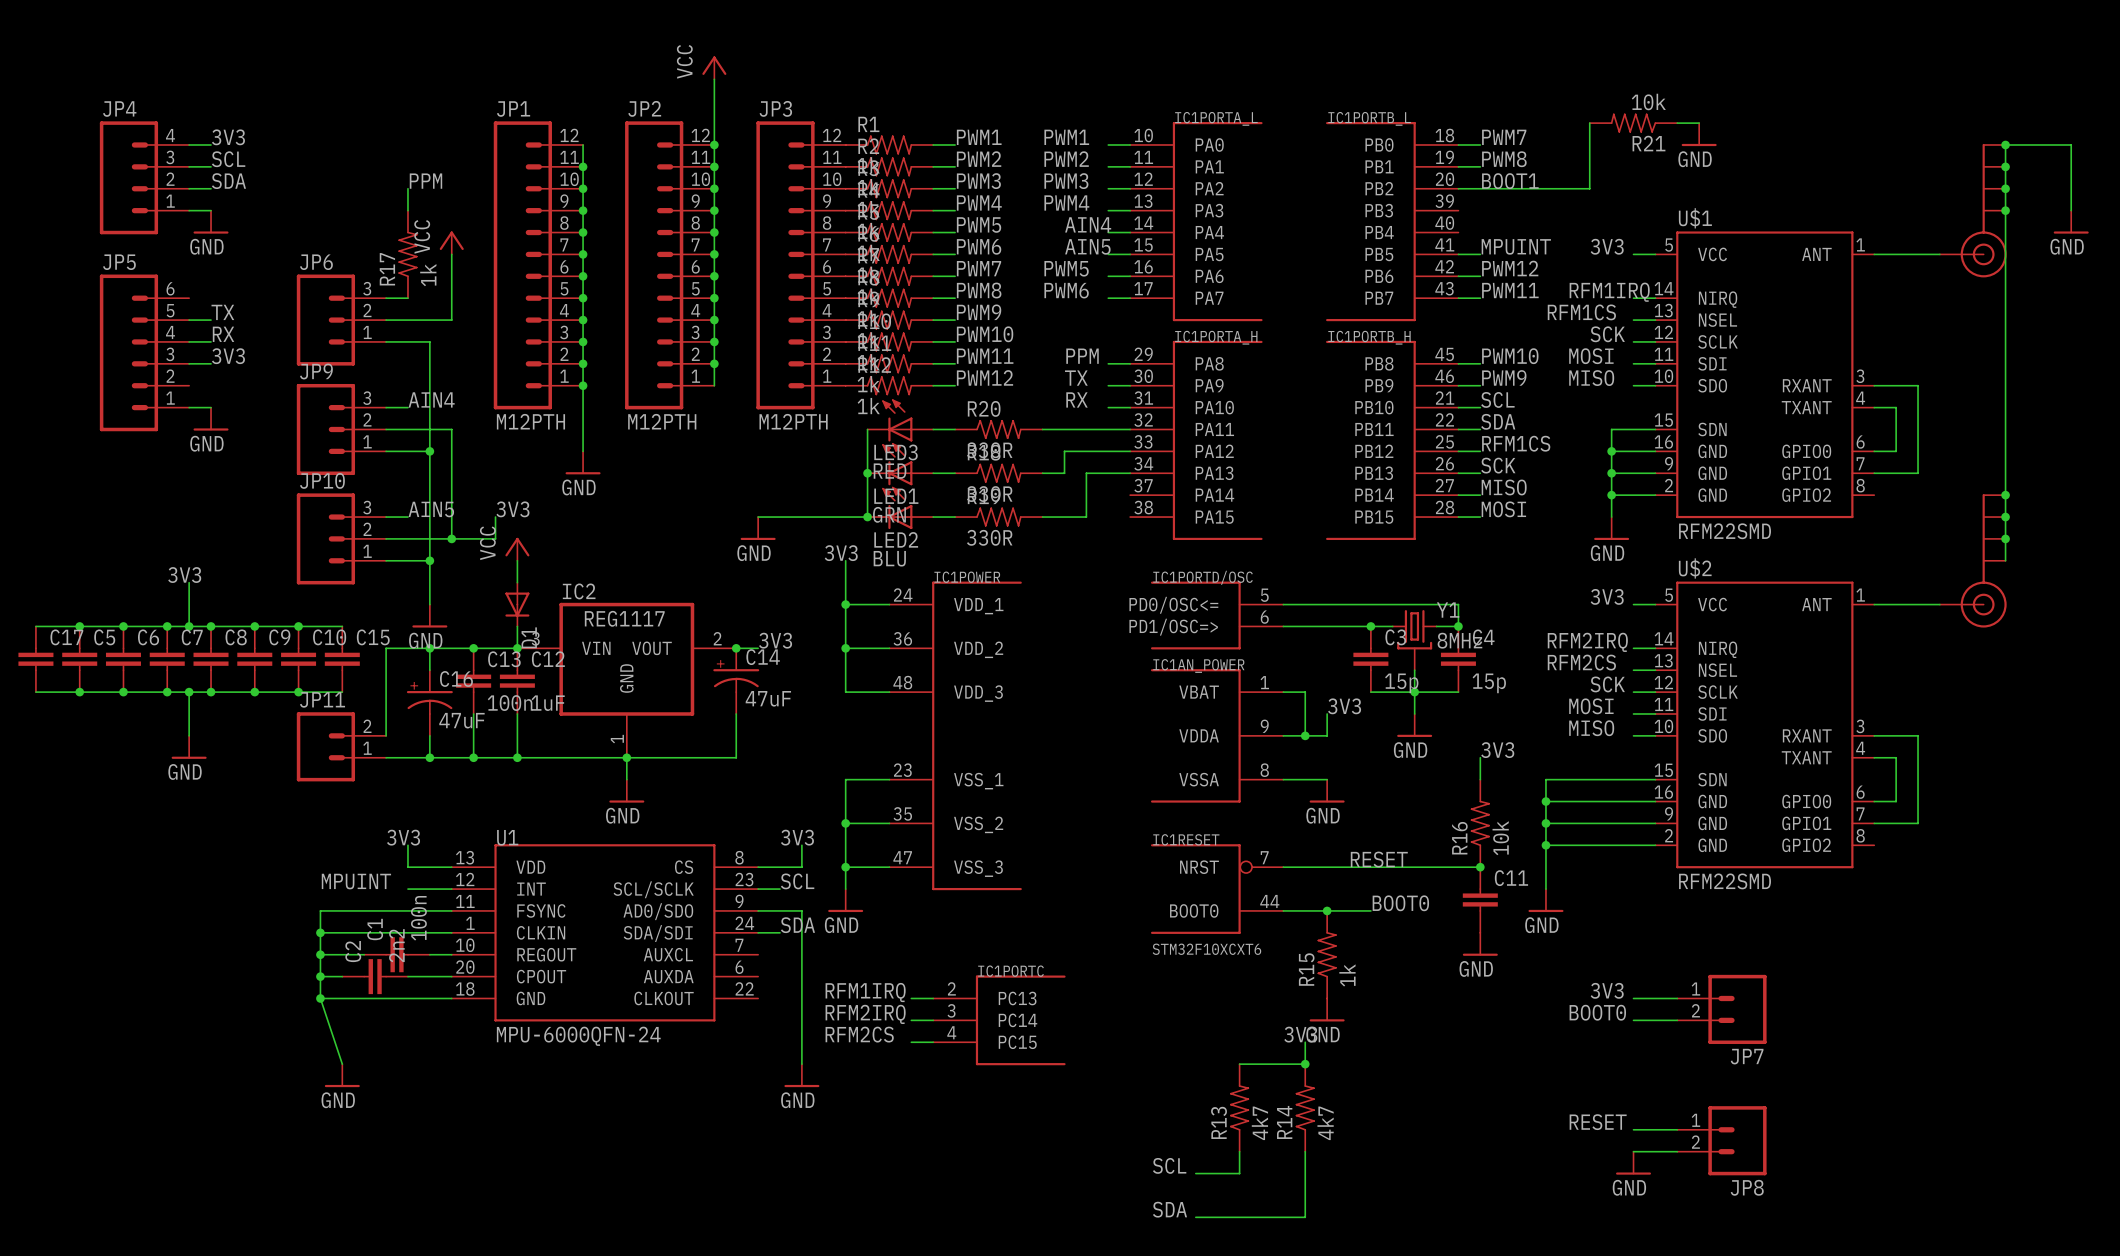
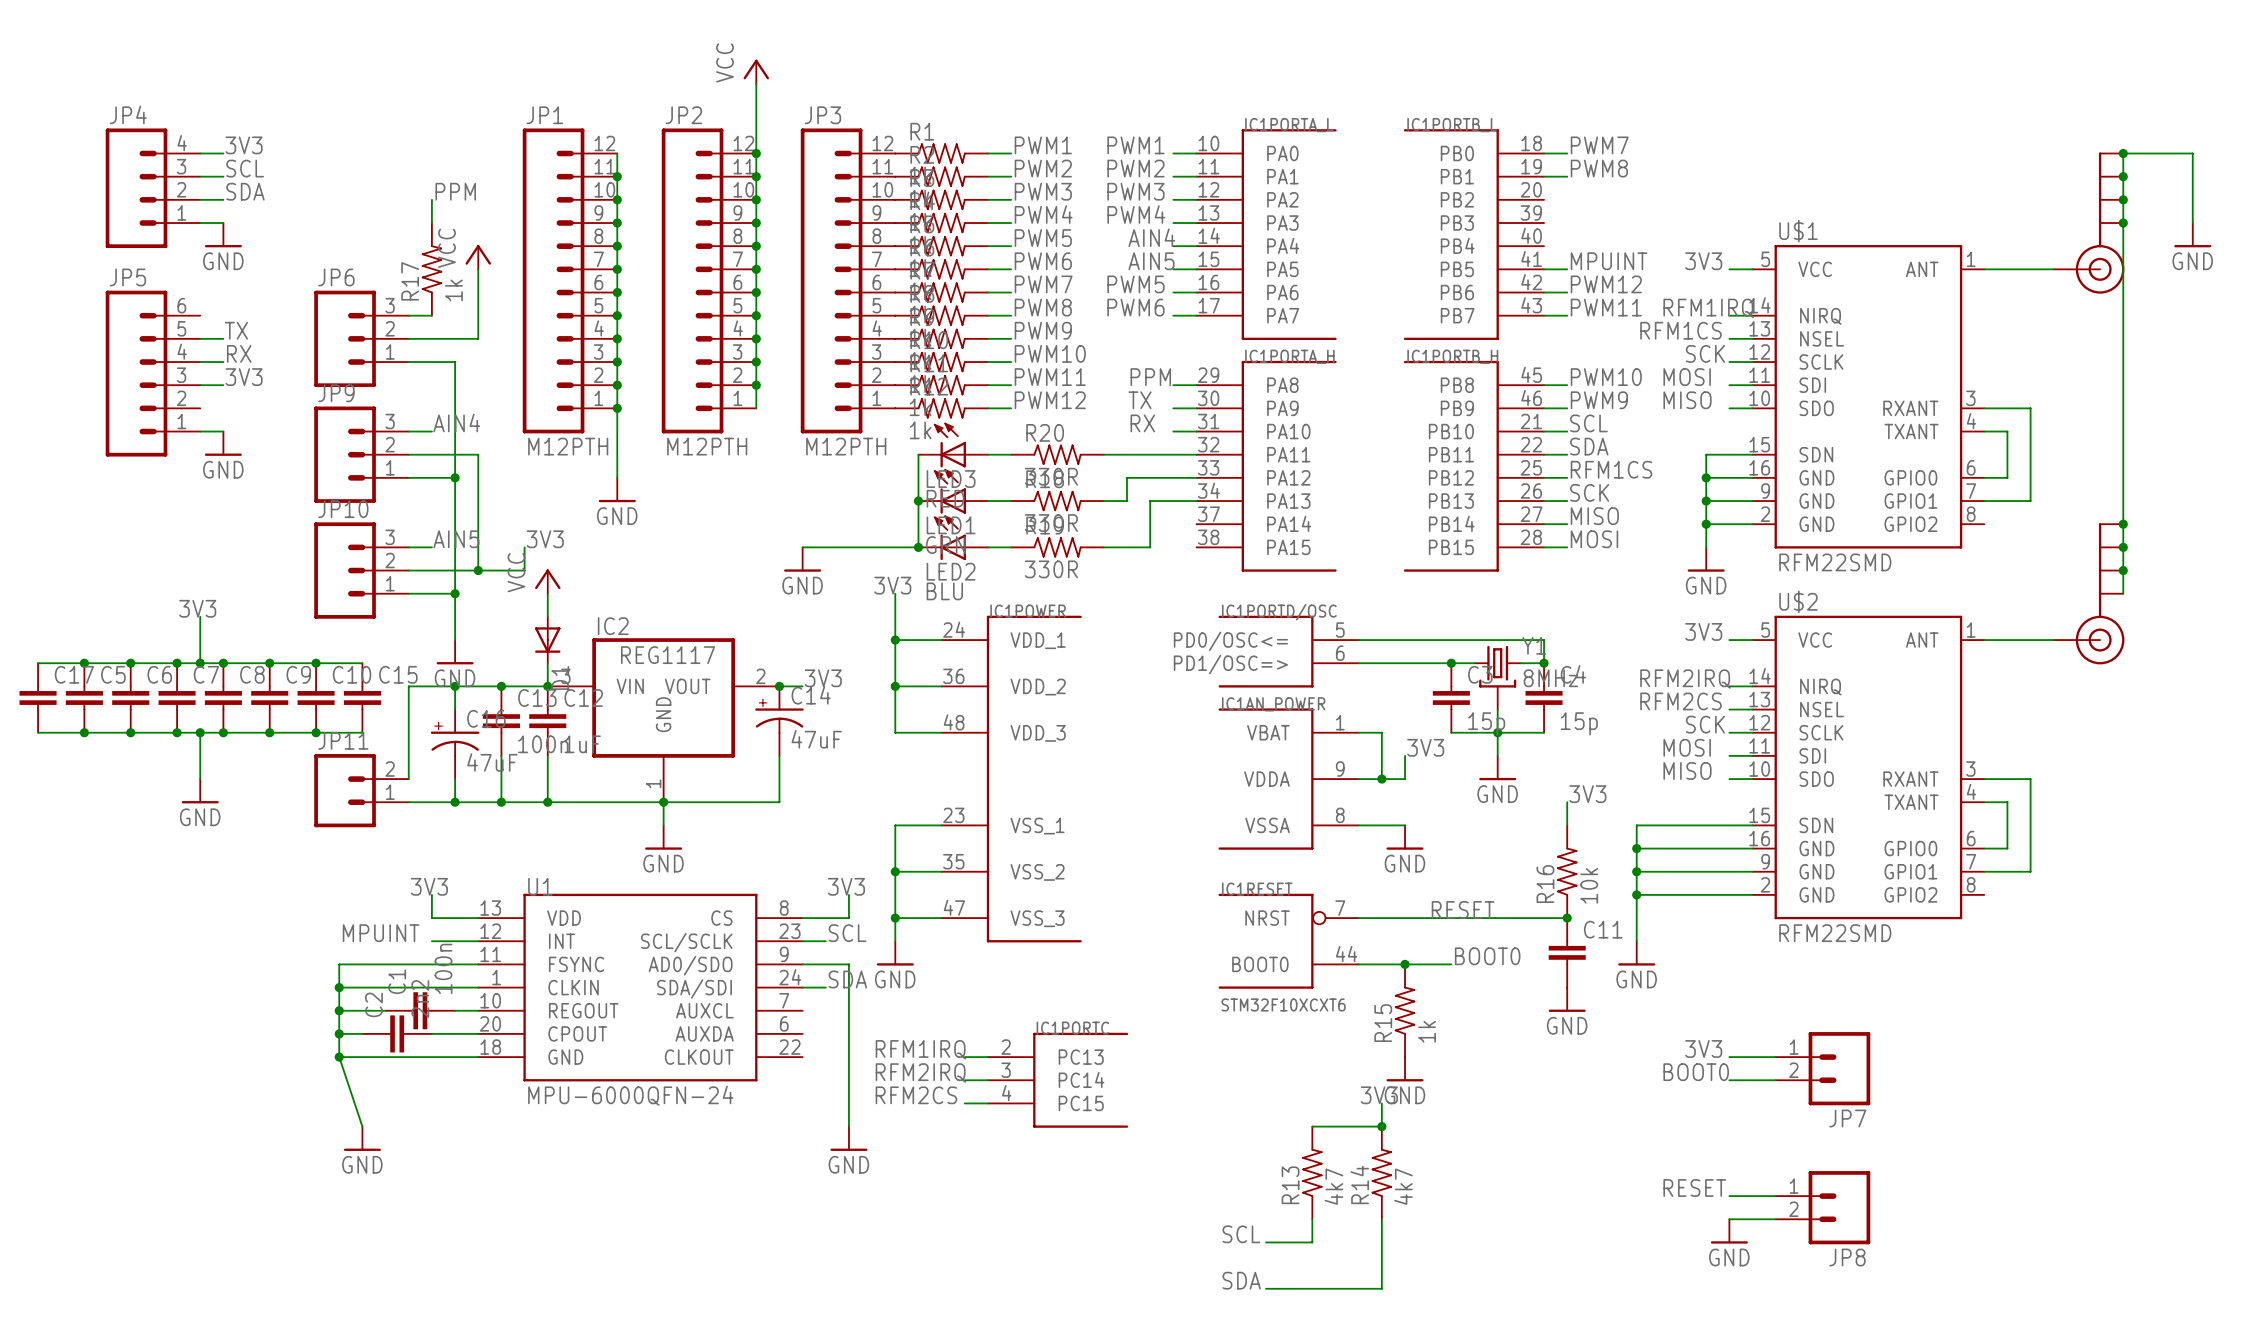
wire: (1589, 123) (1589, 188) (1458, 188) -> none
R21: 10k (1633, 123) -> none
wire: (1677, 123) (1699, 123) -> none
power symbol: GND (1699, 134) -> none
label: BOOT1 (1510, 181) -> none

